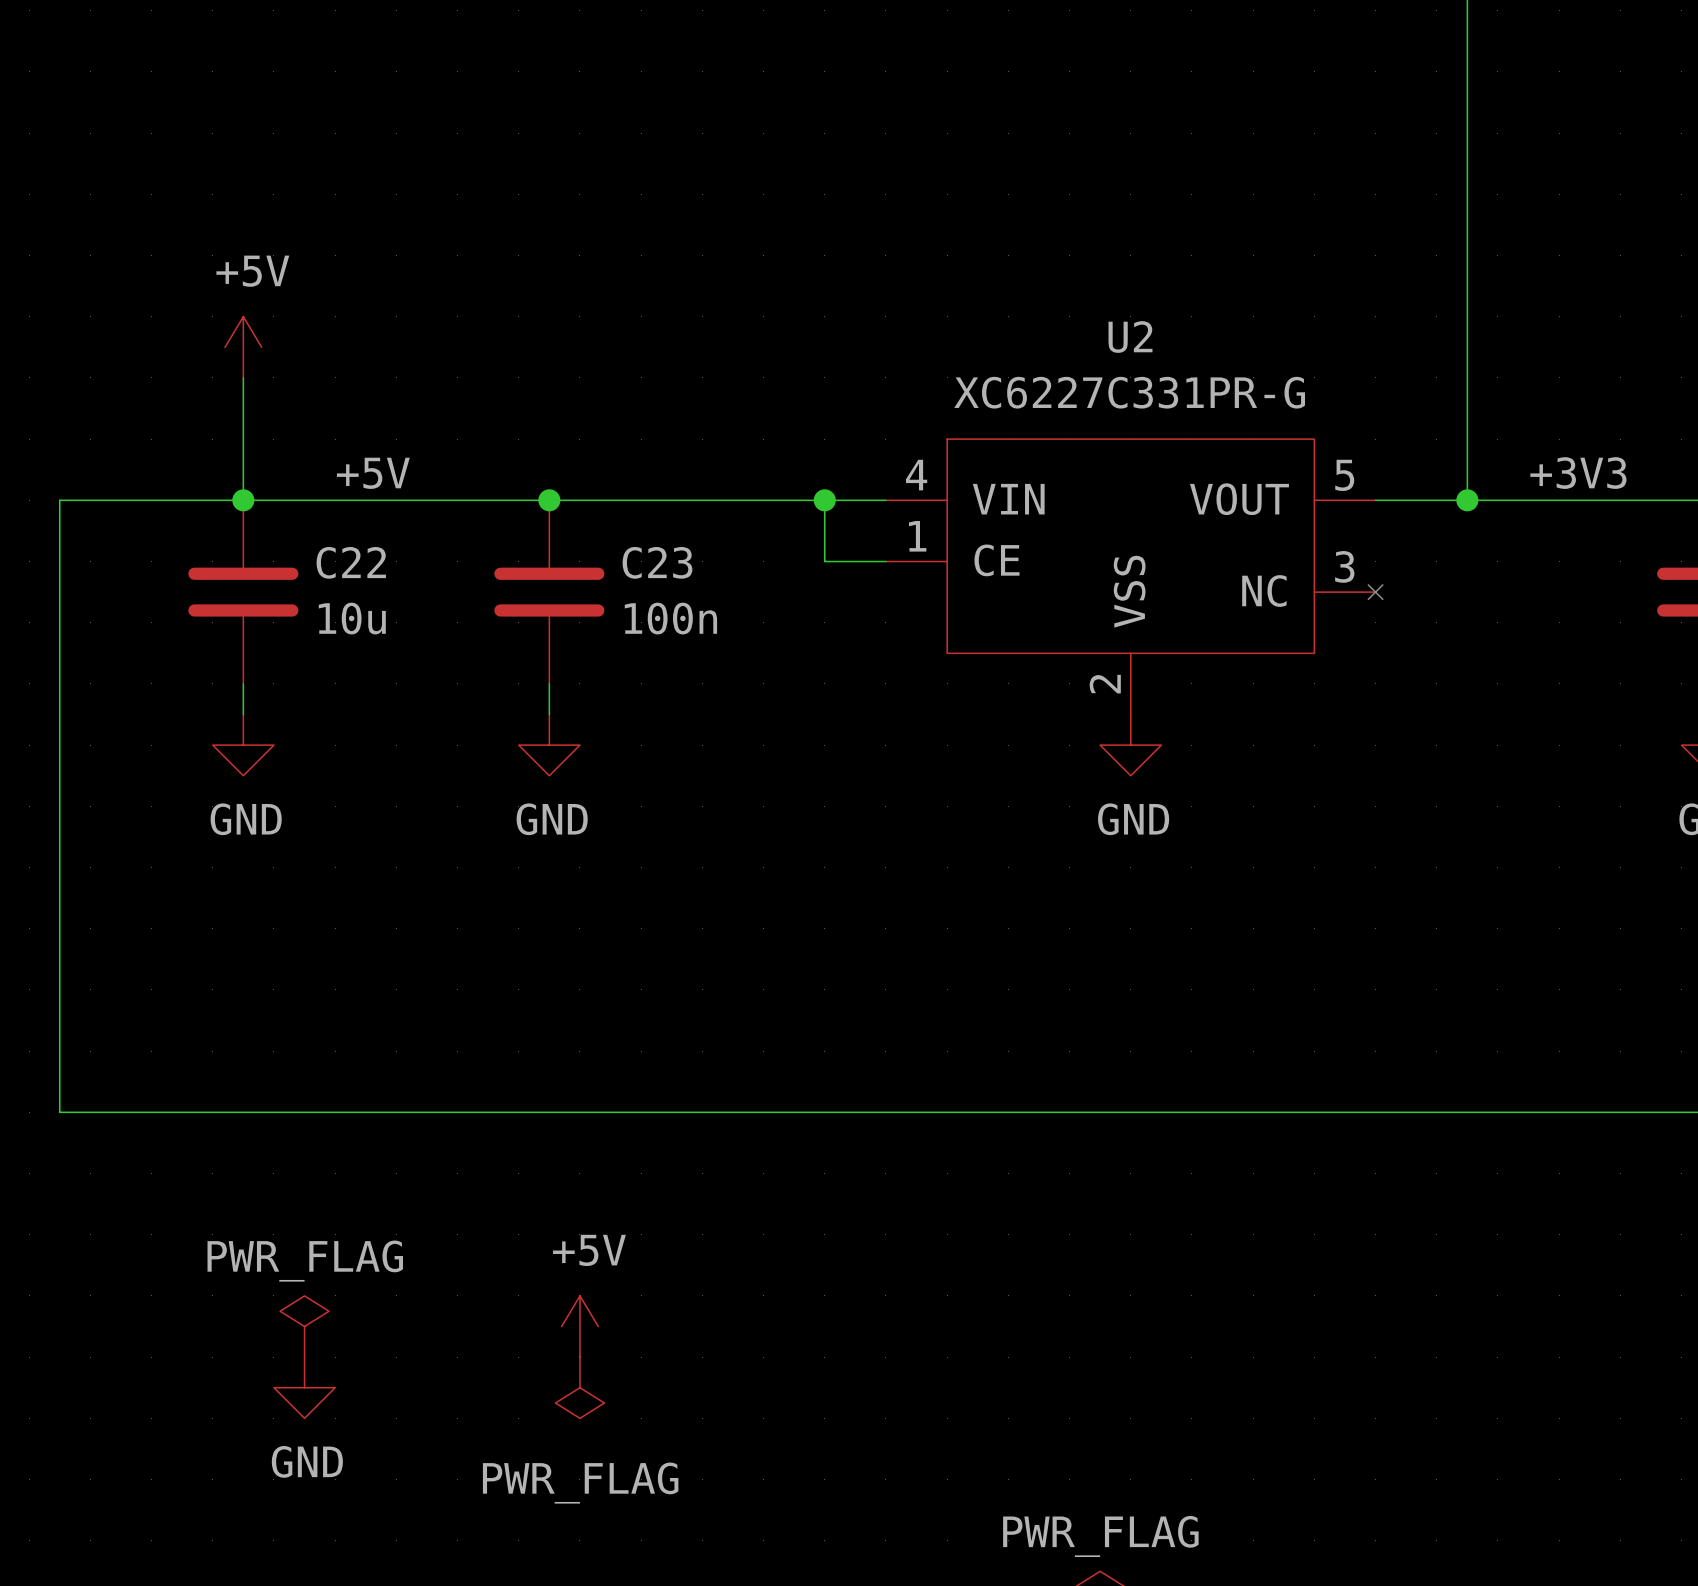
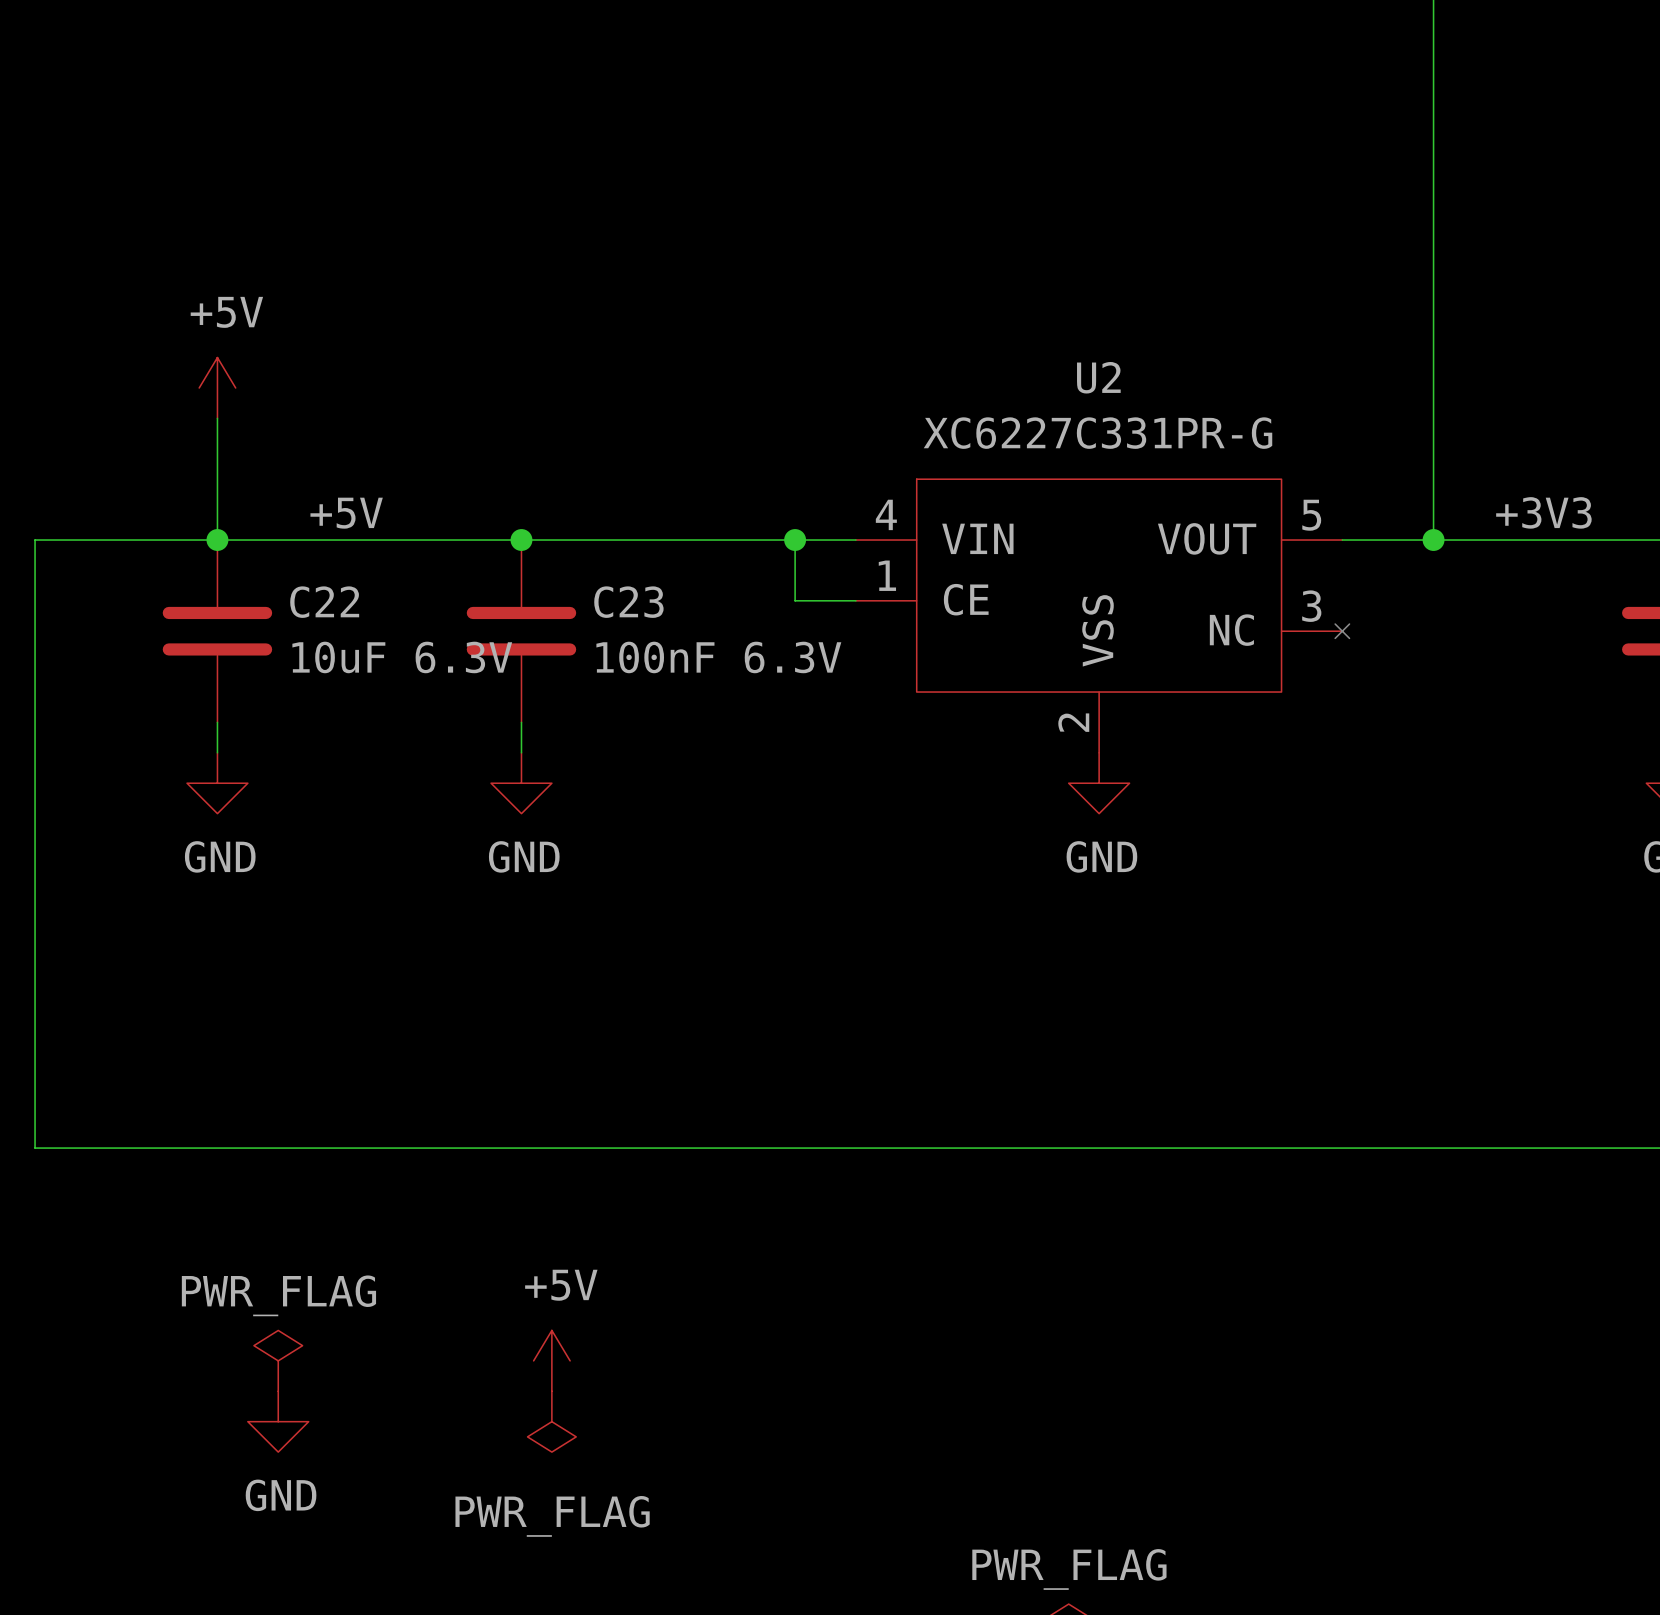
C22 value: 10u (352, 618) -> 10uF 6.3V (402, 657)
C23 value: 100n (670, 618) -> 100nF 6.3V (718, 657)

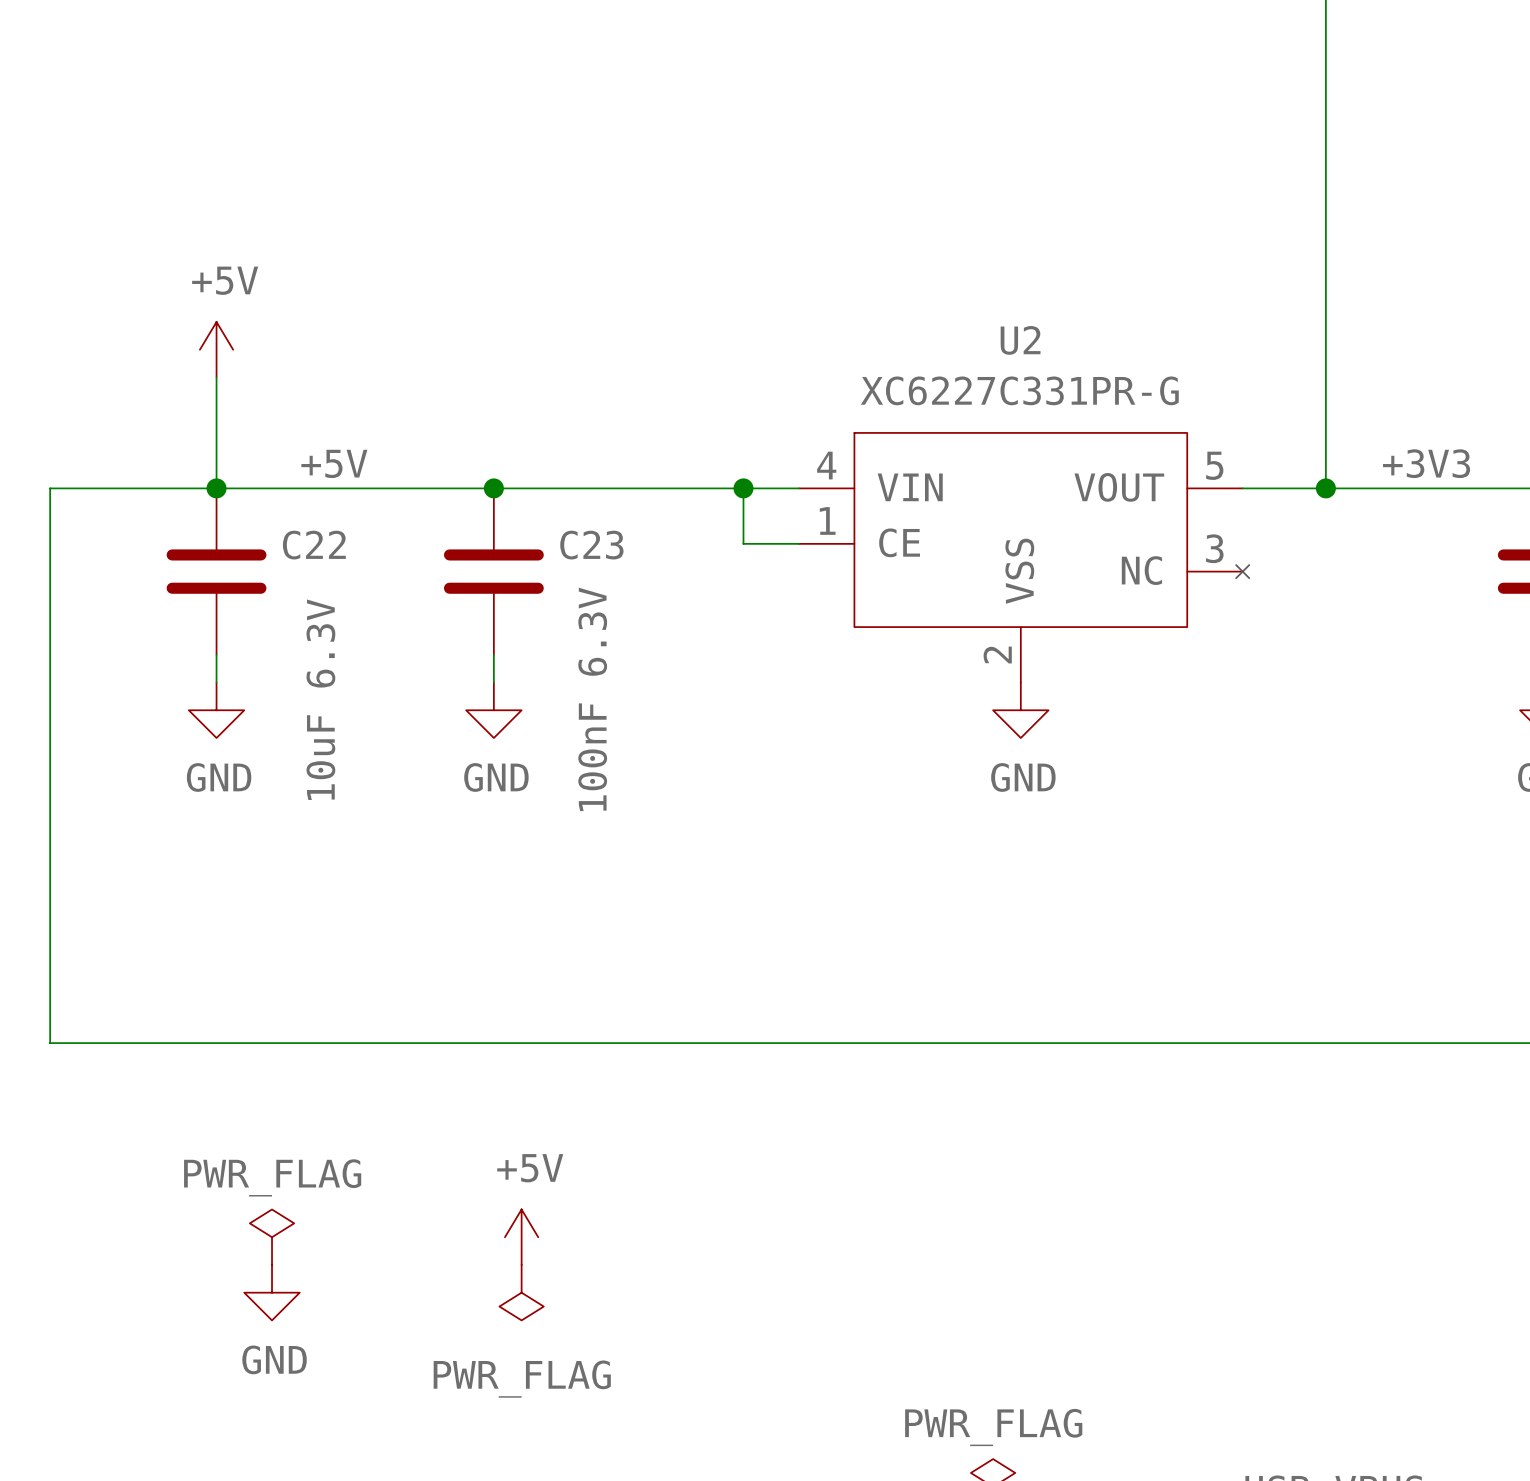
C22 value rotation: 0° (402, 657) -> 90° counterclockwise (320, 699)
C23 value rotation: 0° (718, 657) -> 90° counterclockwise (592, 699)

